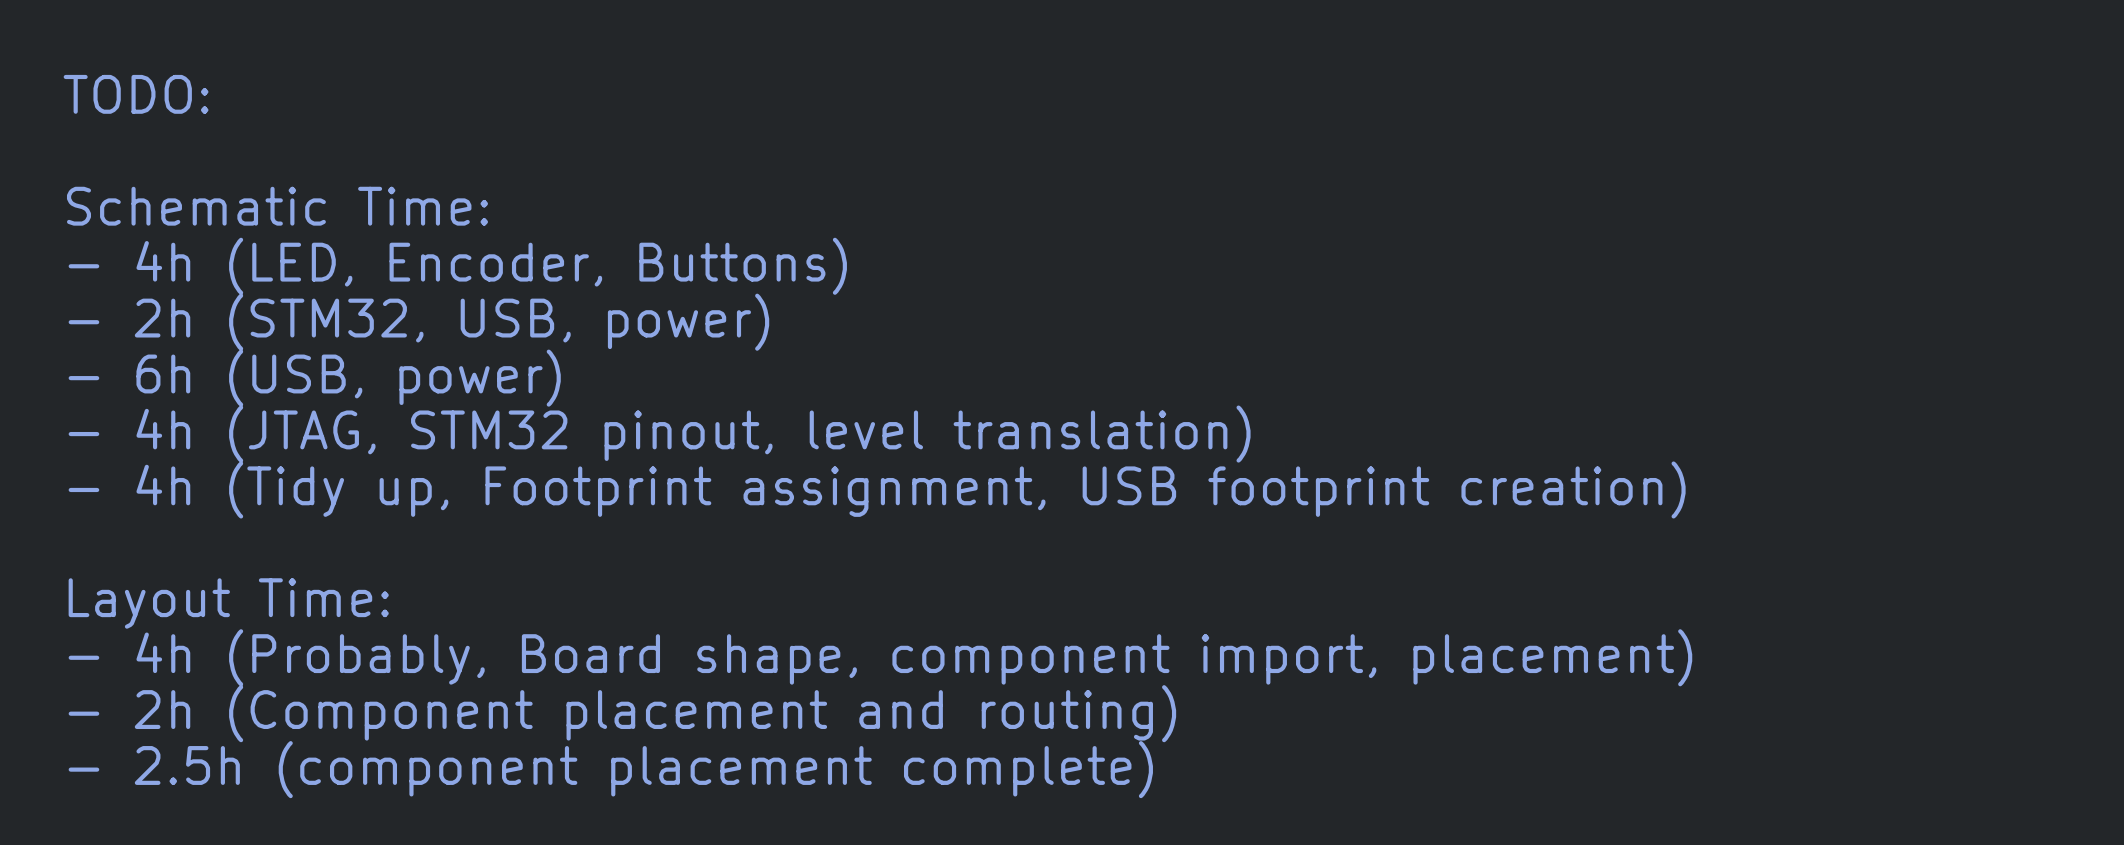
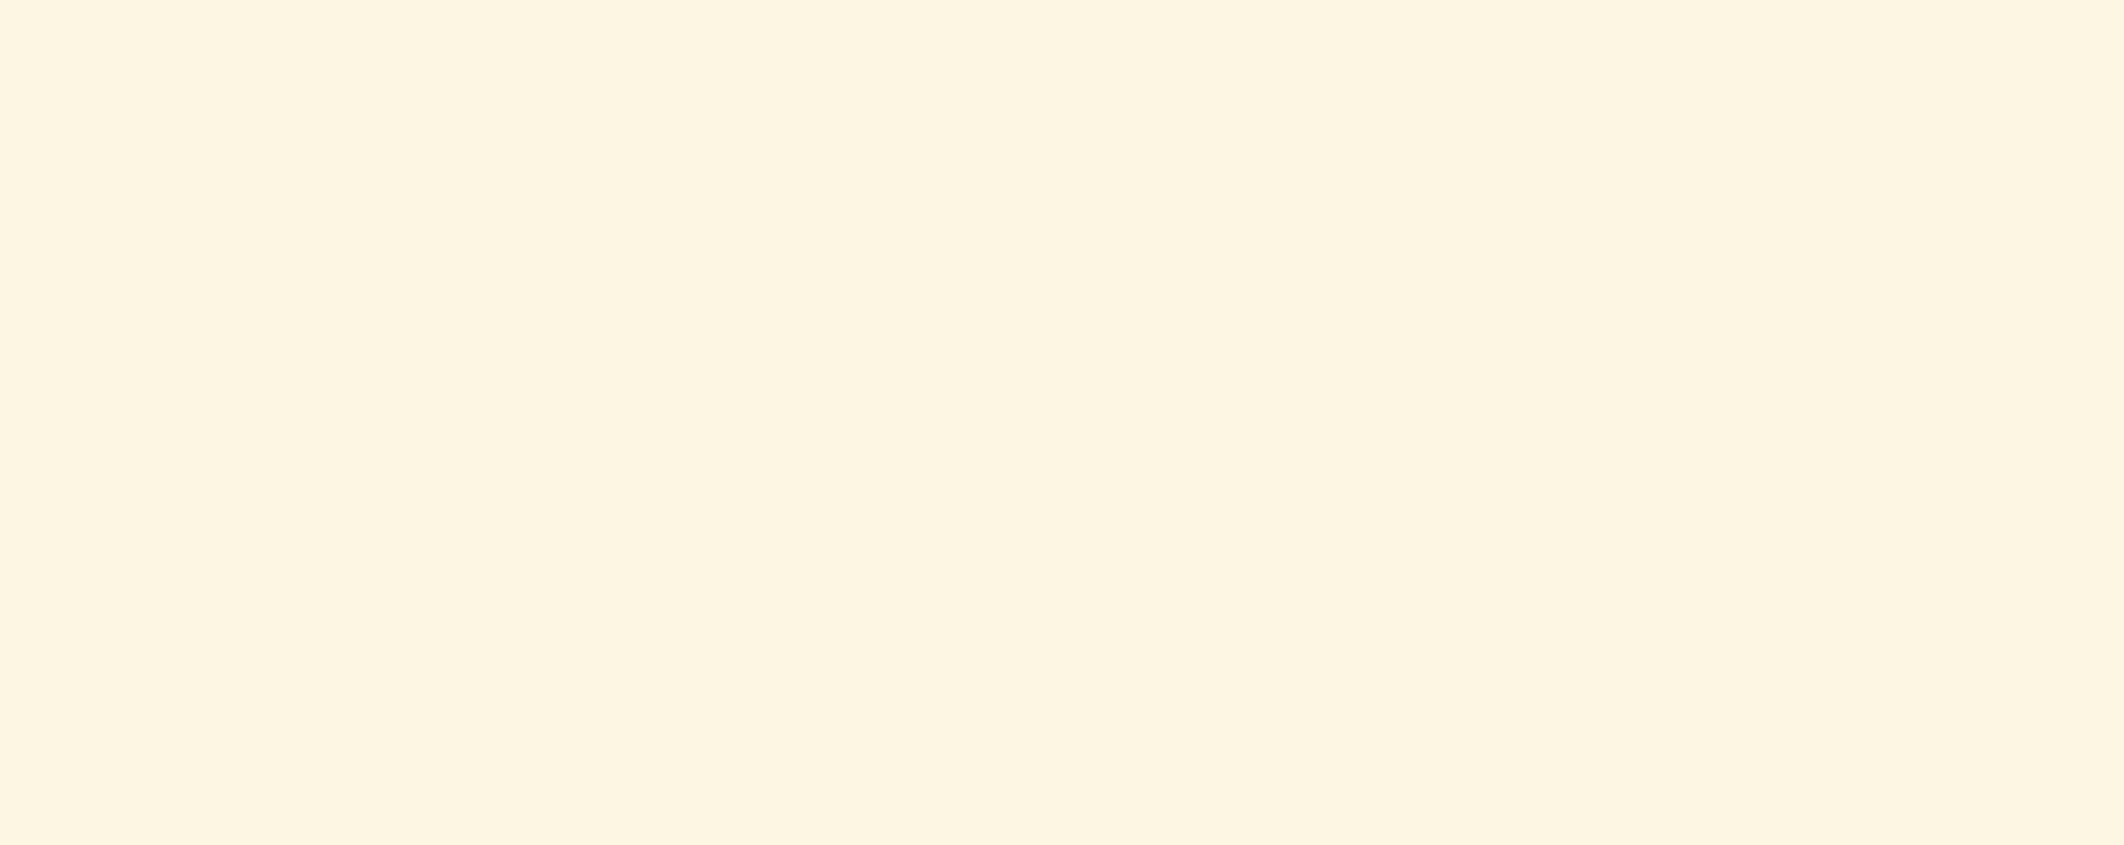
text: TODO: (136, 94) -> none
text: Schematic Time: (277, 206) -> none
text: - 4h (LED, Encoder, Buttons) (457, 266) -> none
text: - 2h (STM32, USB, power) (418, 322) -> none
text: - 6h (USB, power) (314, 378) -> none
text: - 4h (JTAG, STM32 pinout, level translation) (659, 434) -> none
text: - 4h (Tidy up, Footprint assignment, USB footprint creation) (877, 489) -> none
text: Layout Time: (228, 603) -> none
text: - 4h (Probably, Board shape, component import, placement) (880, 657) -> none
text: - 2h (Component placement and routing) (622, 713) -> none
text: - 2.5h (component placement complete) (610, 769) -> none

